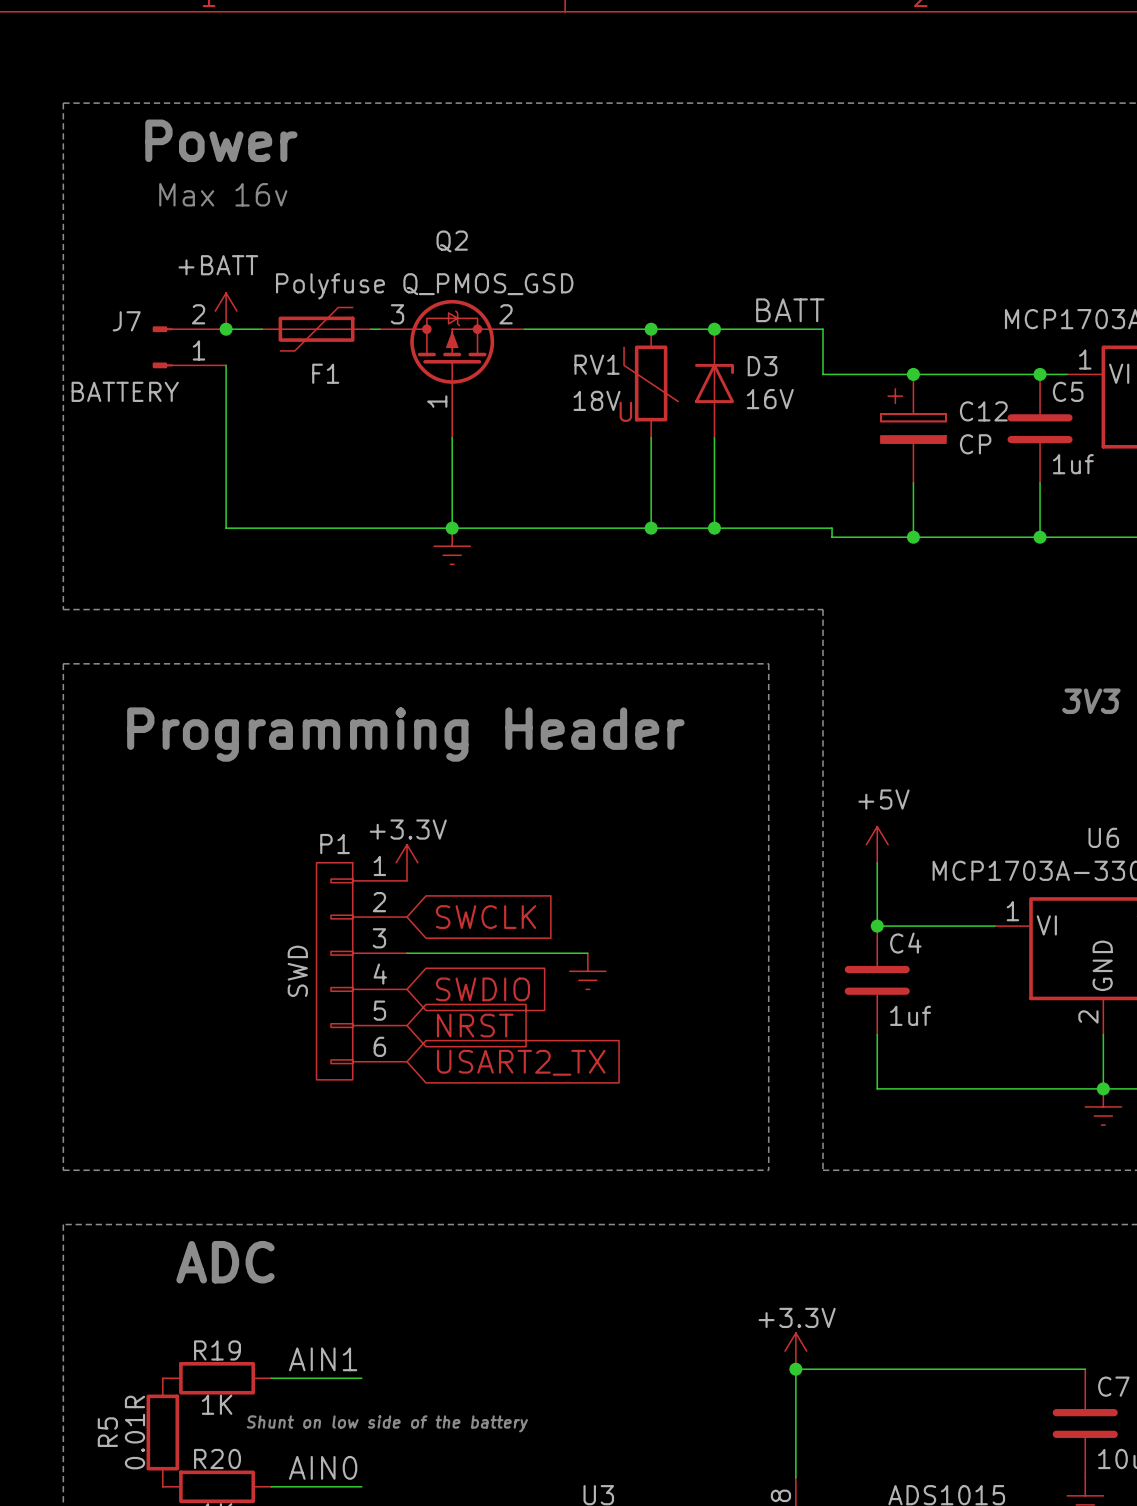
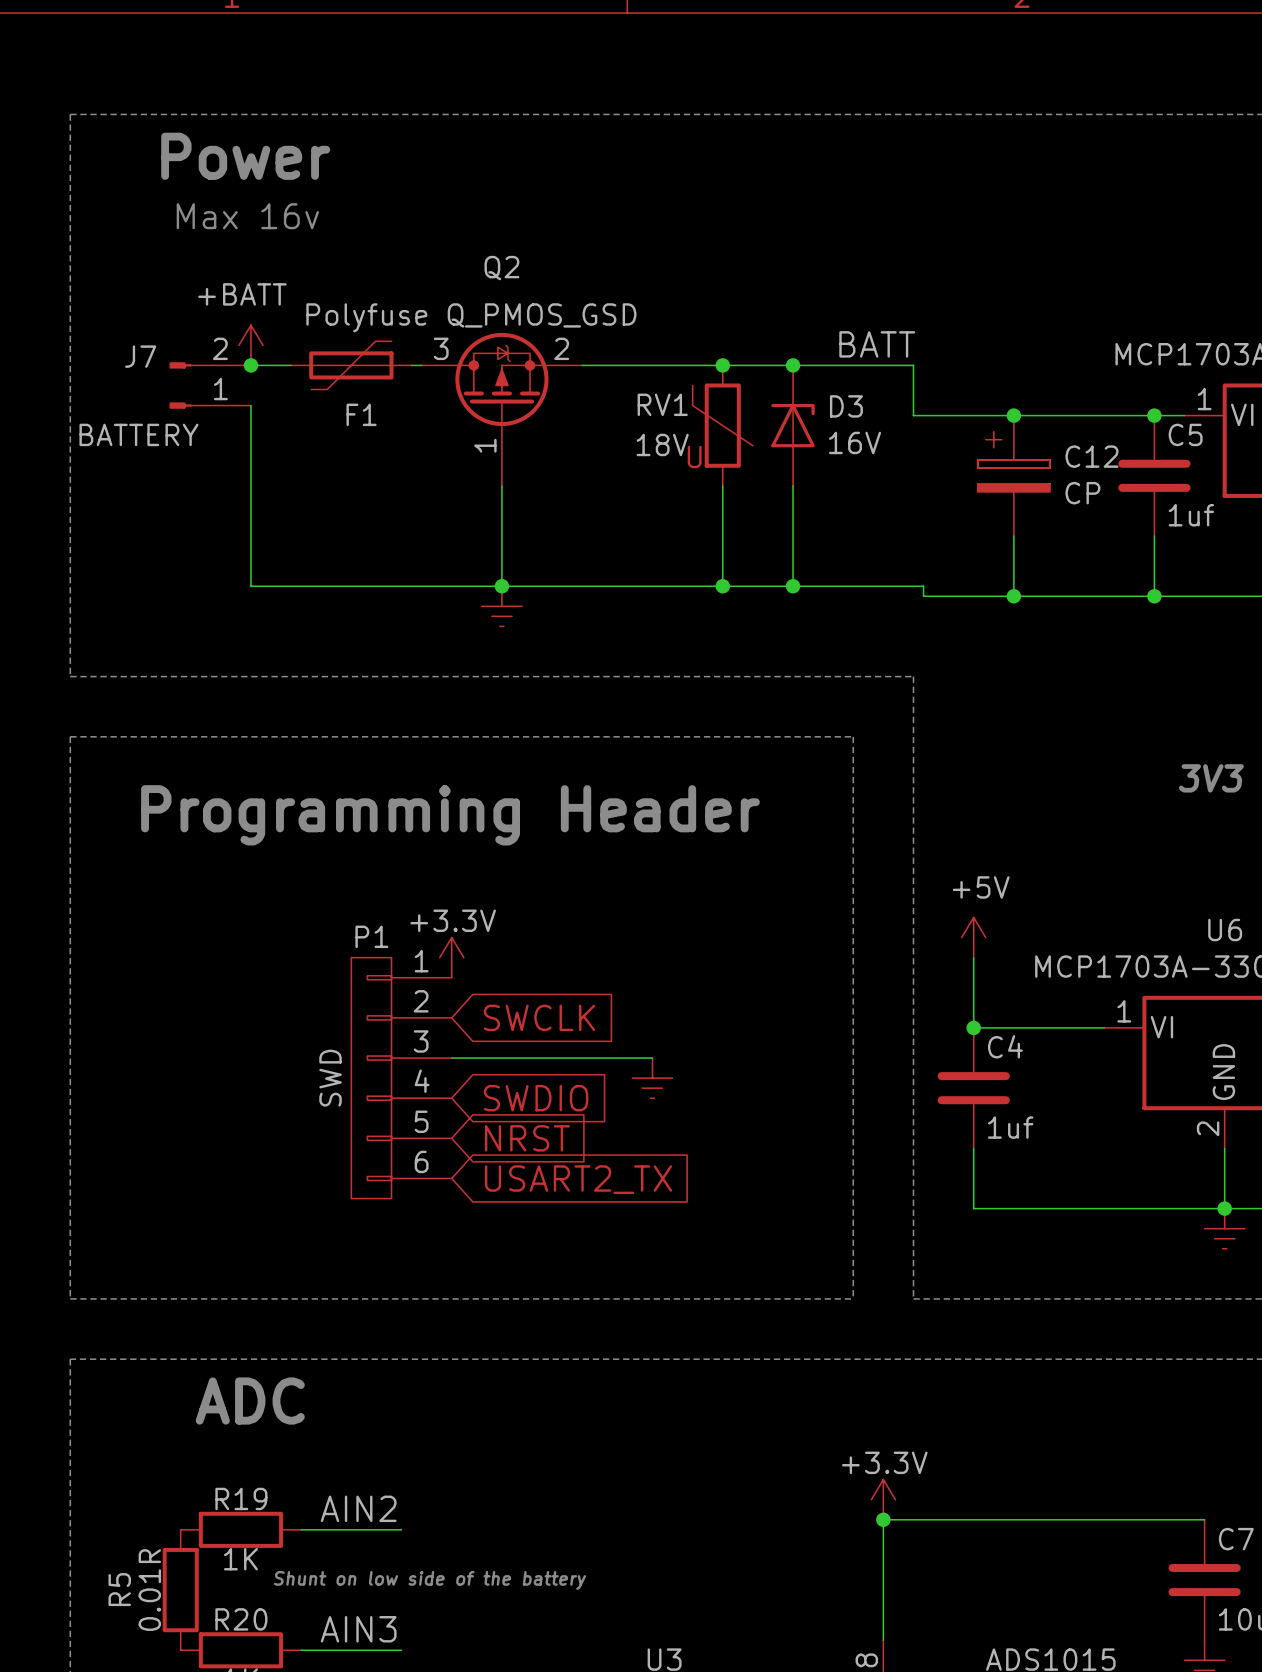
label: AIN1 (323, 1359) -> AIN2 (358, 1508)
label: AIN0 (323, 1467) -> AIN3 (358, 1629)

